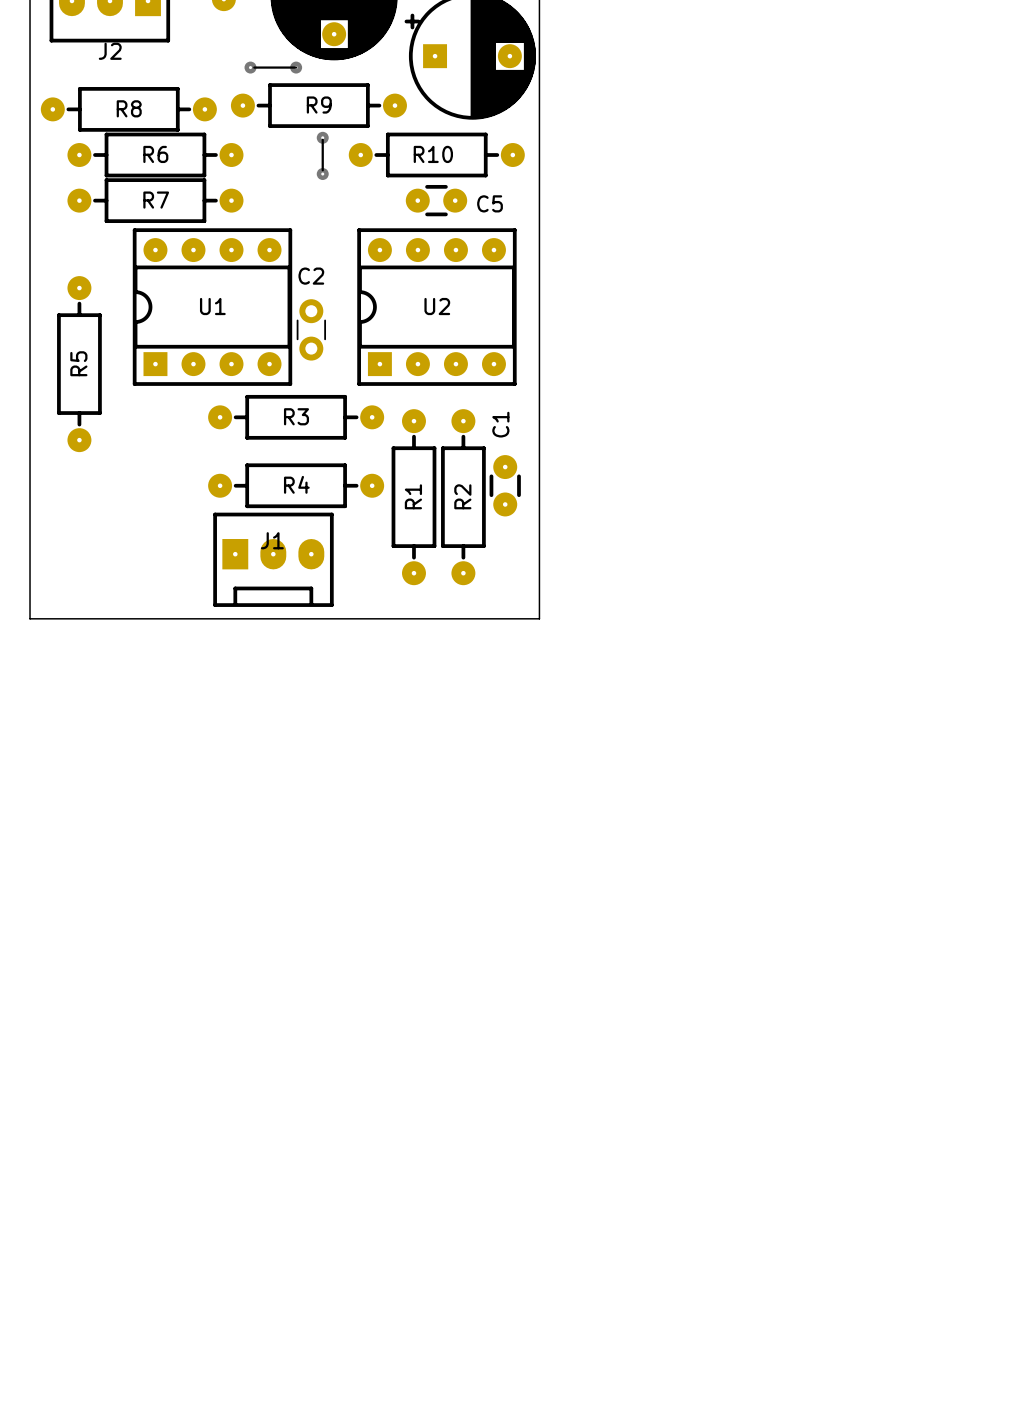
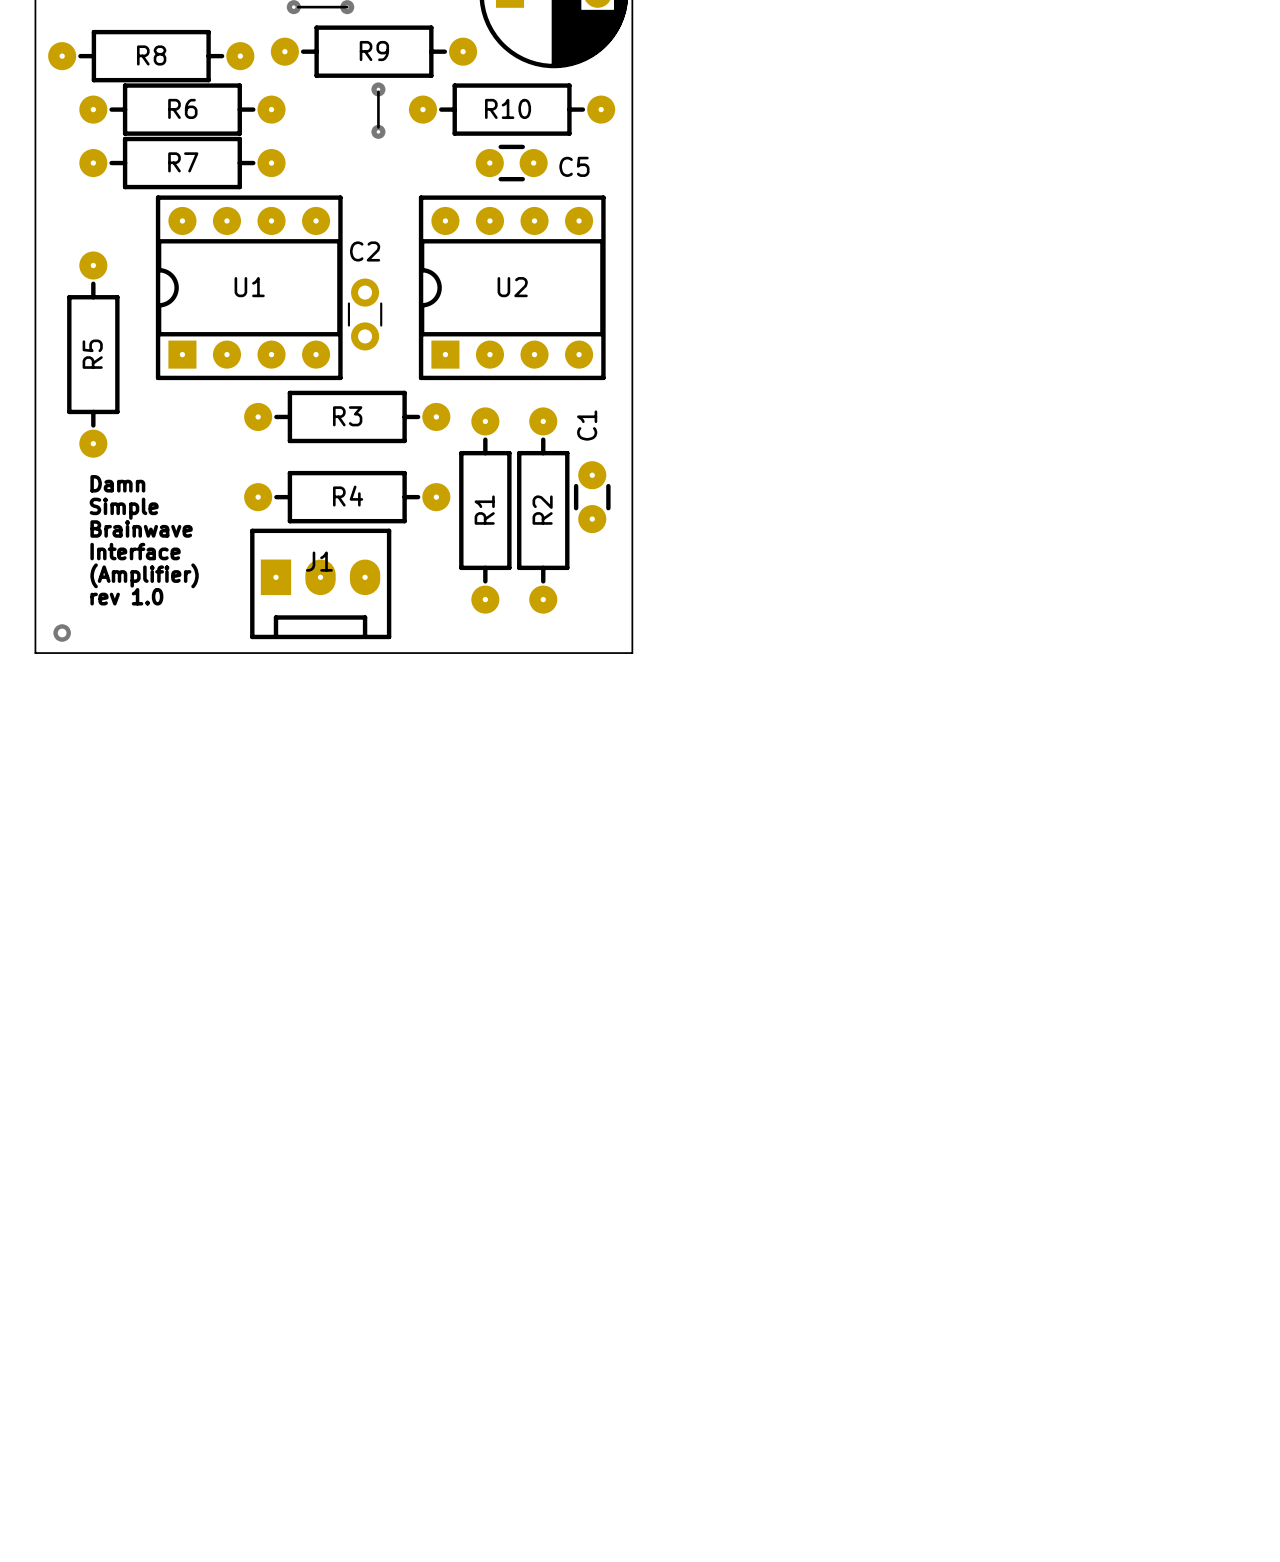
text: none -> Damn (117, 483)
text: none -> Simple (124, 508)
text: none -> Brainwave (141, 528)
text: none -> Interface (135, 551)
text: none -> (Amplifier) (144, 575)
text: none -> rev 1.0 (126, 596)
via: none -> (62, 633)

